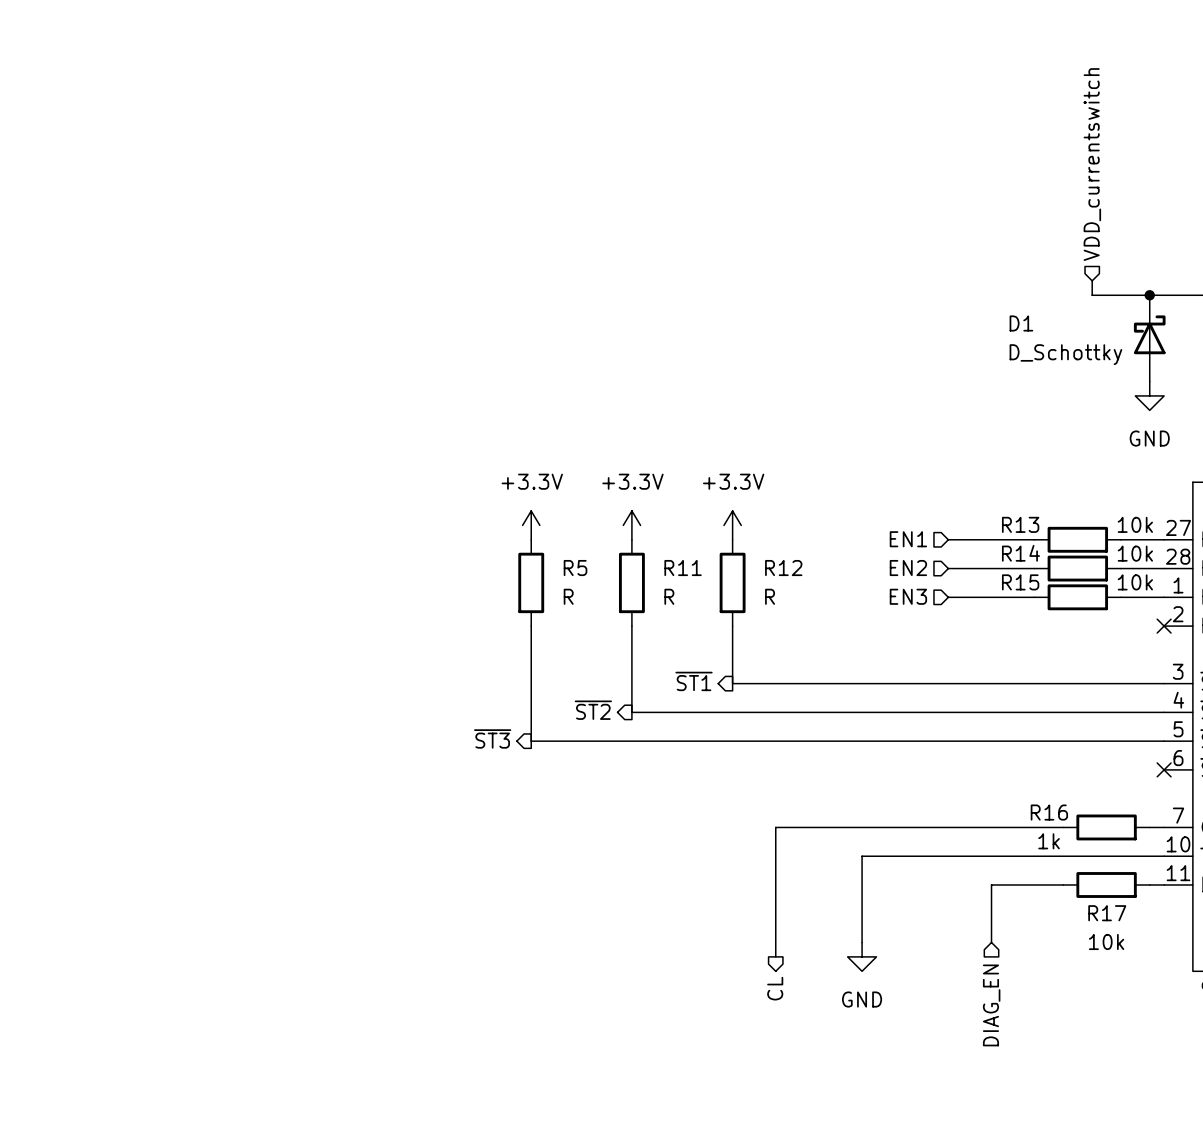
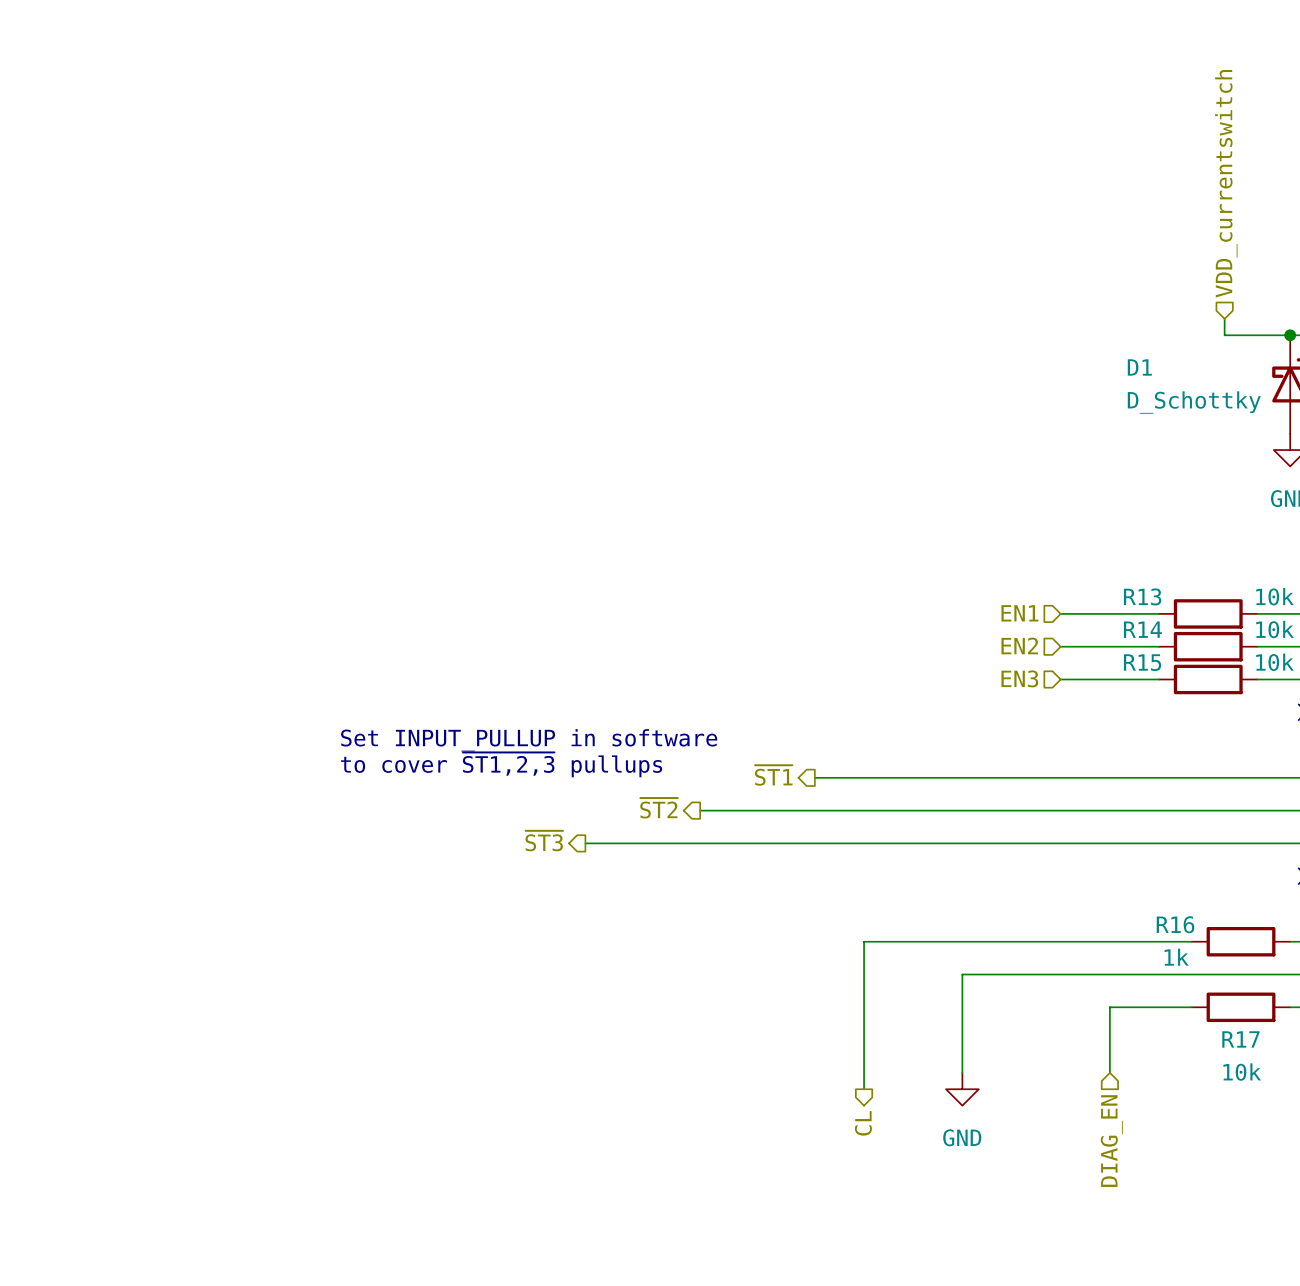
power symbol: +3.3V (531, 525) -> none
power symbol: +3.3V (631, 525) -> none
power symbol: +3.3V (732, 525) -> none
R5: R (531, 582) -> none
R11: R (631, 582) -> none
R12: R (732, 582) -> none
wire: (531, 626) (531, 741) -> none
wire: (631, 626) (631, 712) -> none
wire: (732, 626) (732, 683) -> none
text: none -> Set INPUT_PULLUP in software (529, 740)
text: none -> to cover ~{ST1,2,3} pullups (501, 764)

